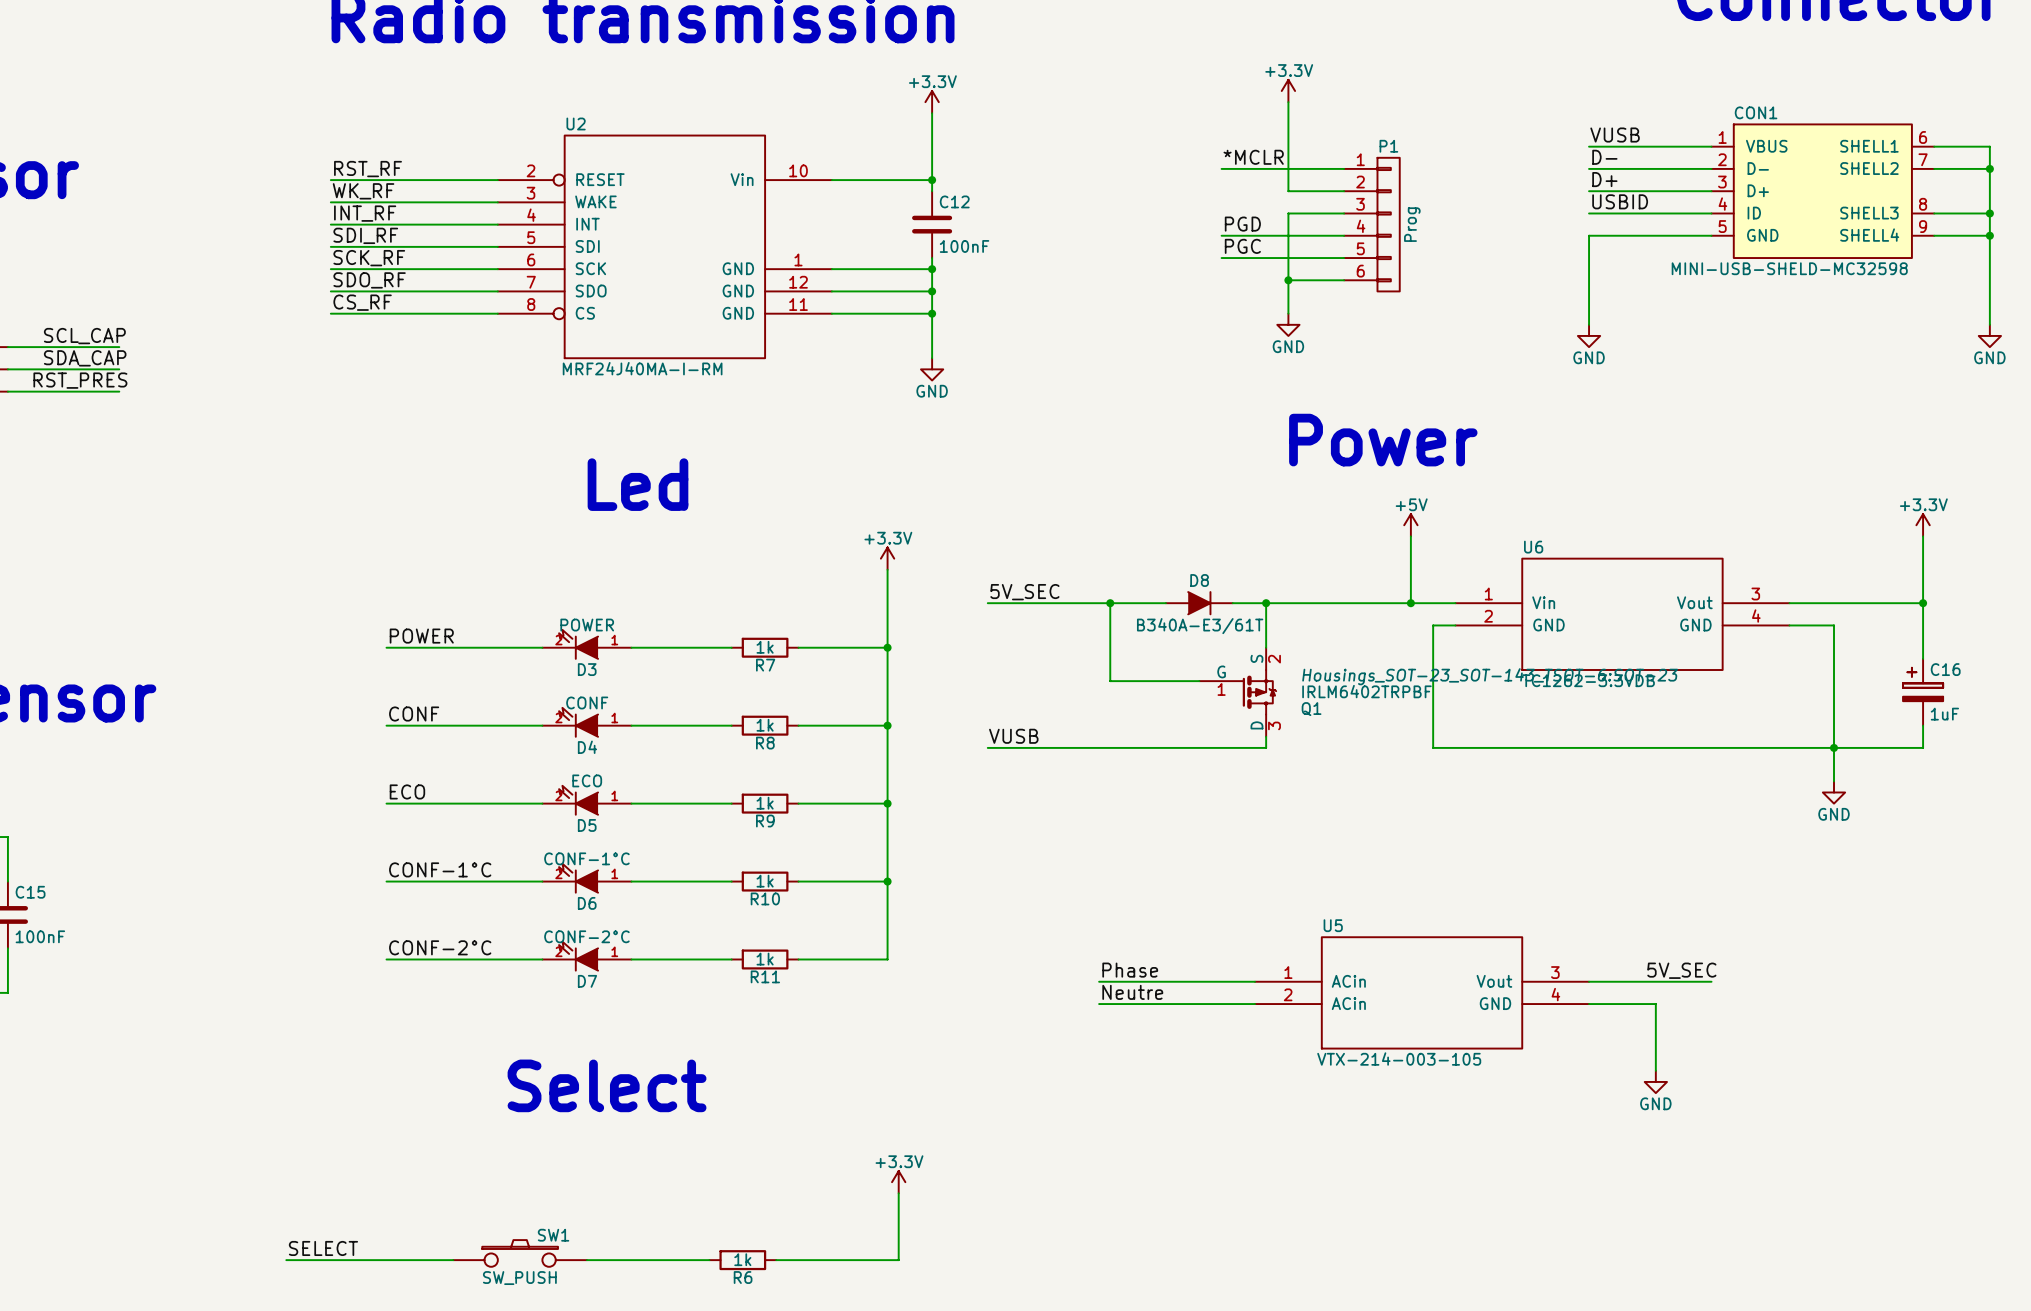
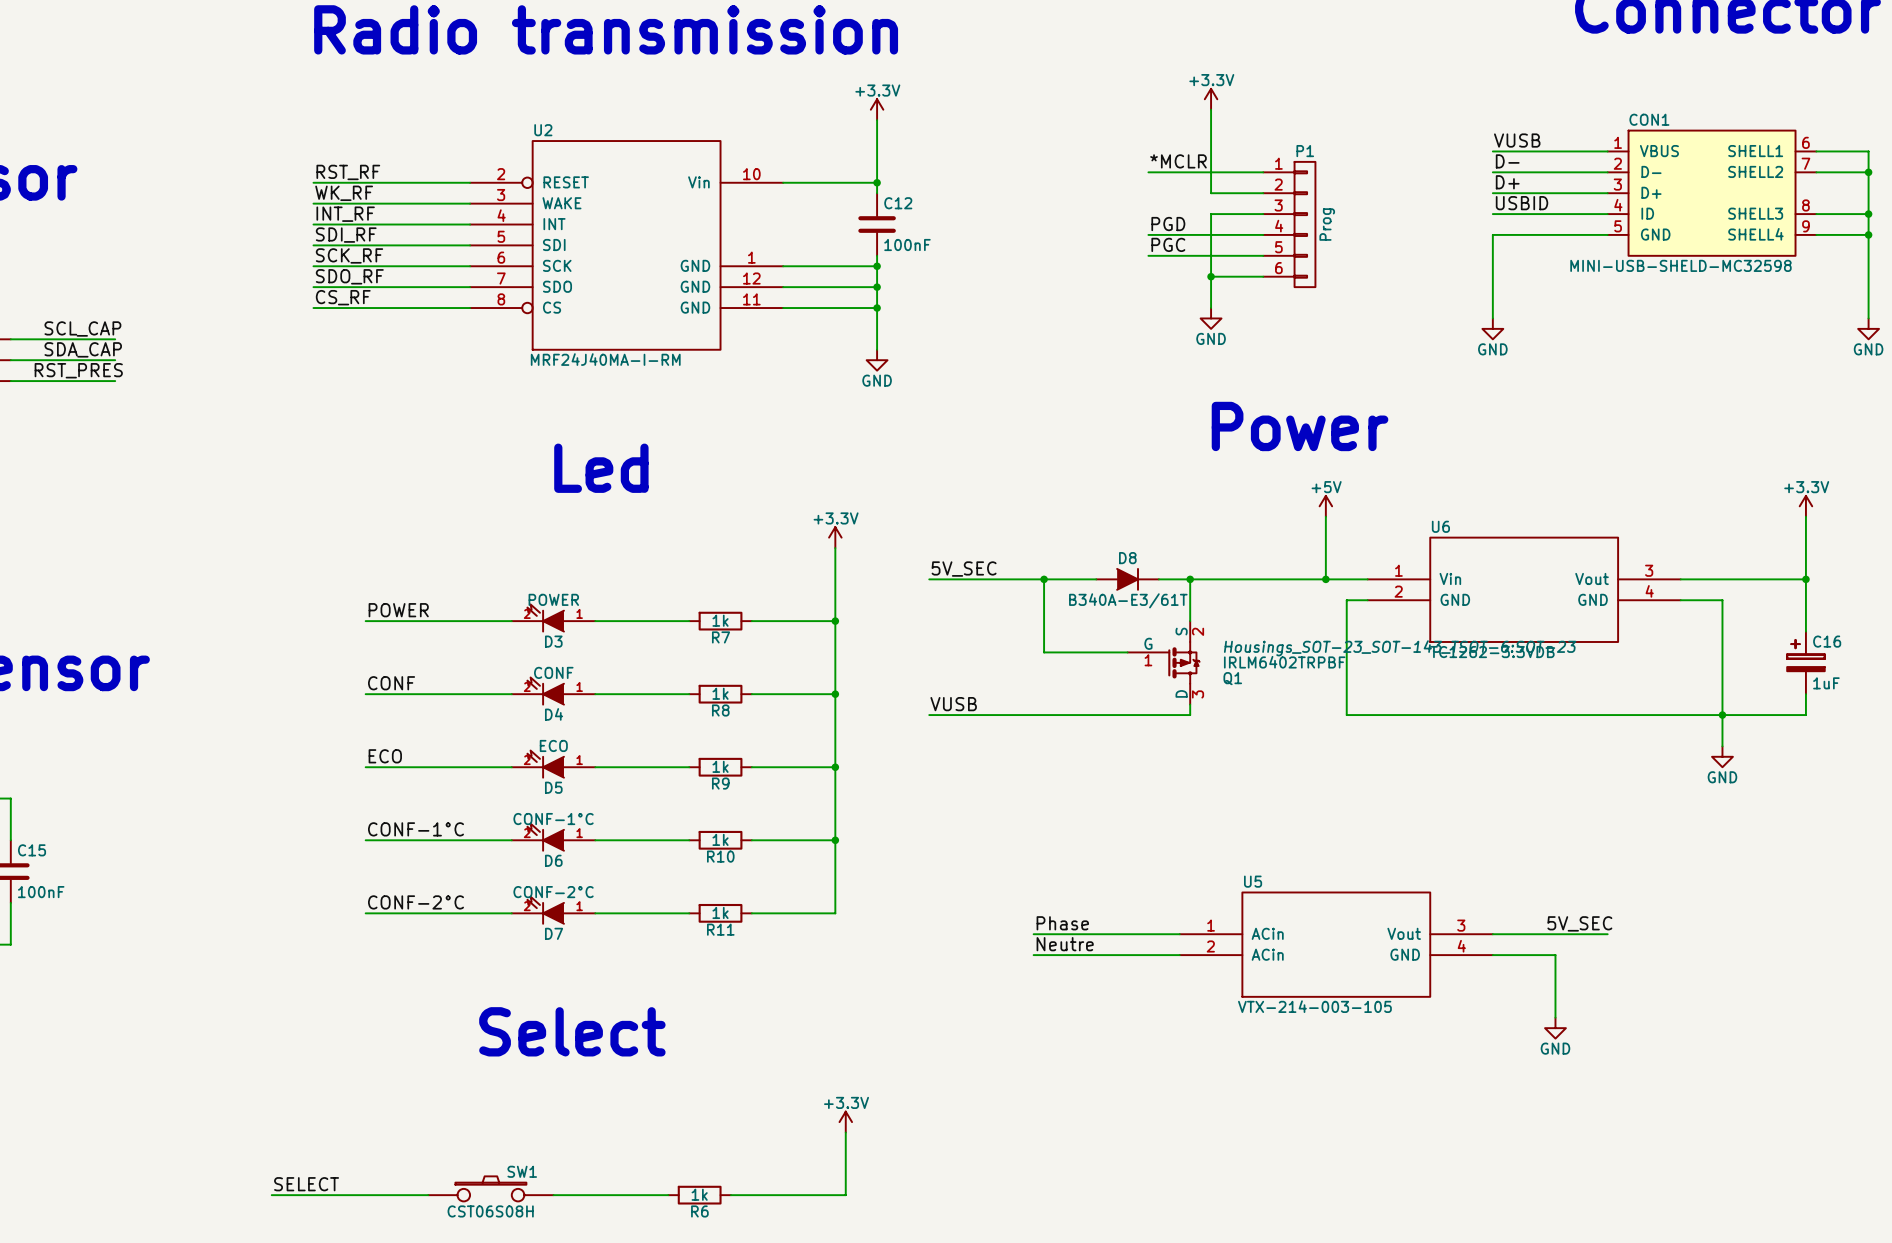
SW1 value: SW_PUSH (519, 1278) -> CST06S08H (490, 1211)

